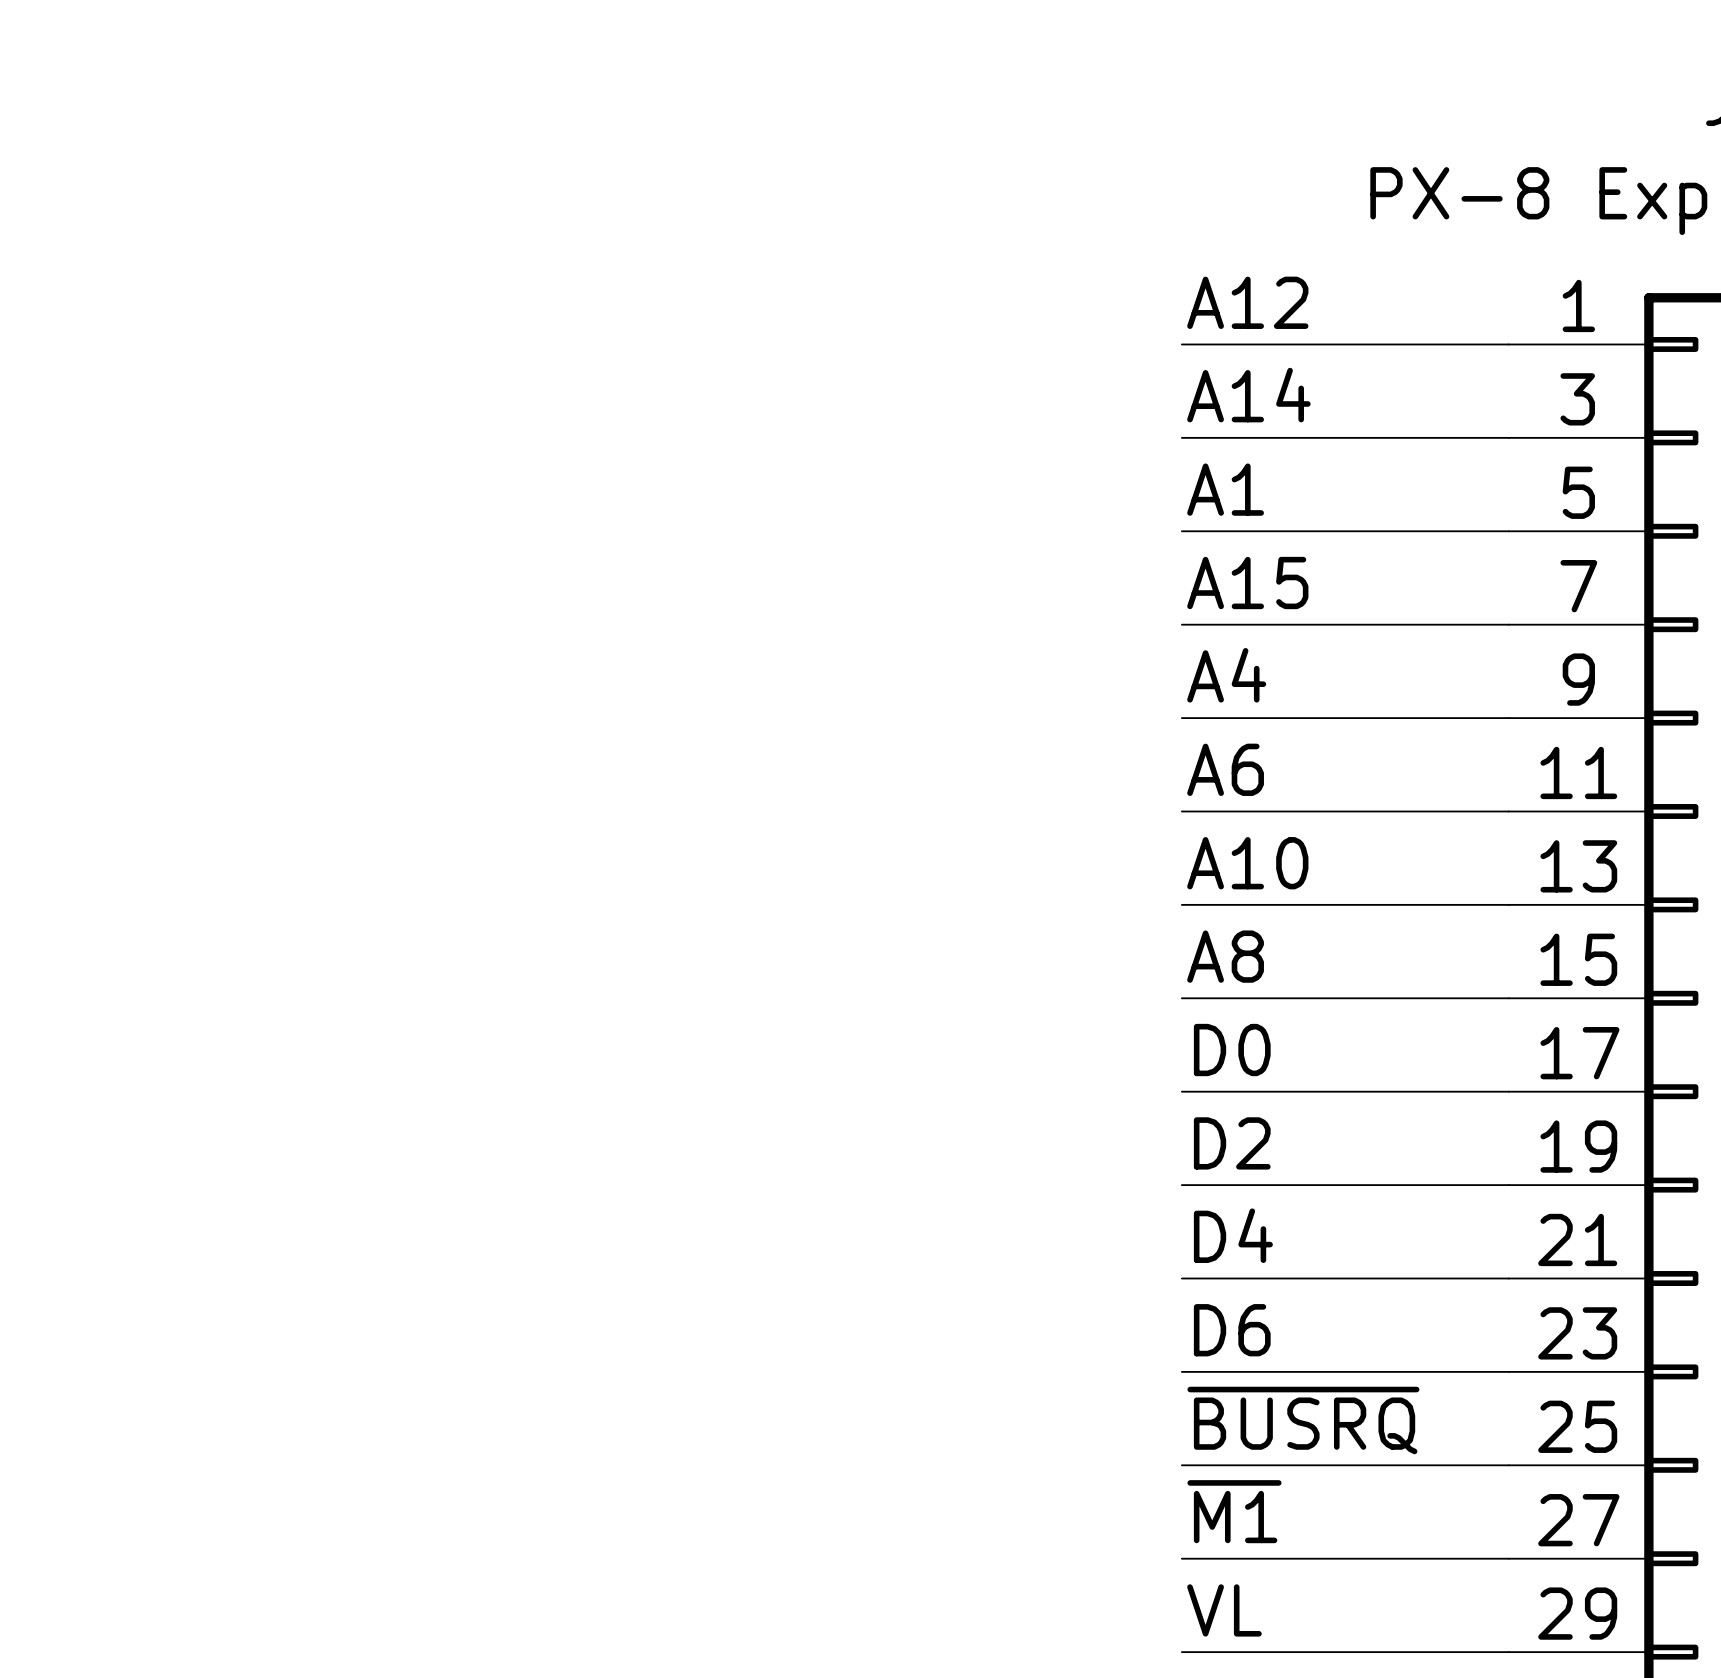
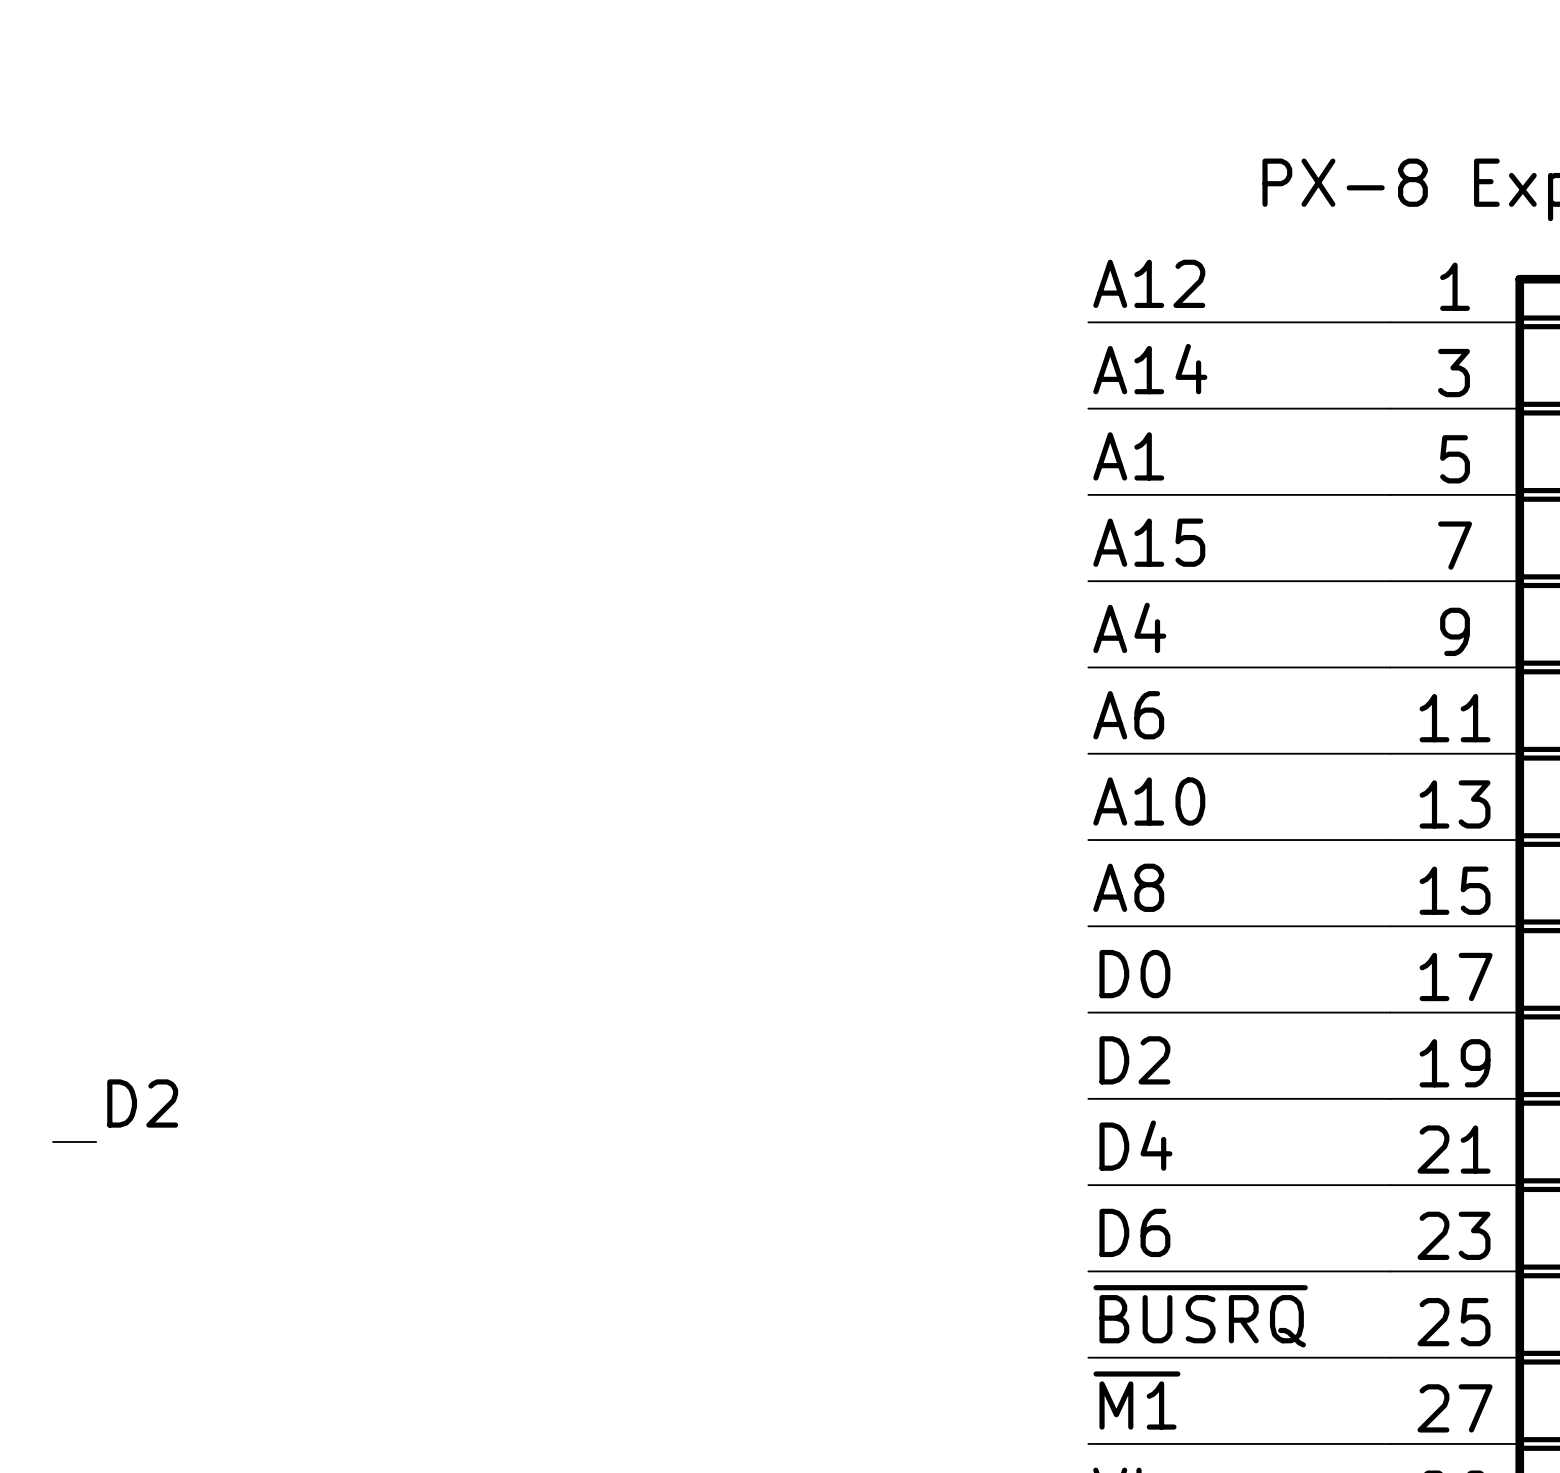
label: none -> D2 (142, 1103)
wire: none -> (53, 1142) (96, 1142)

